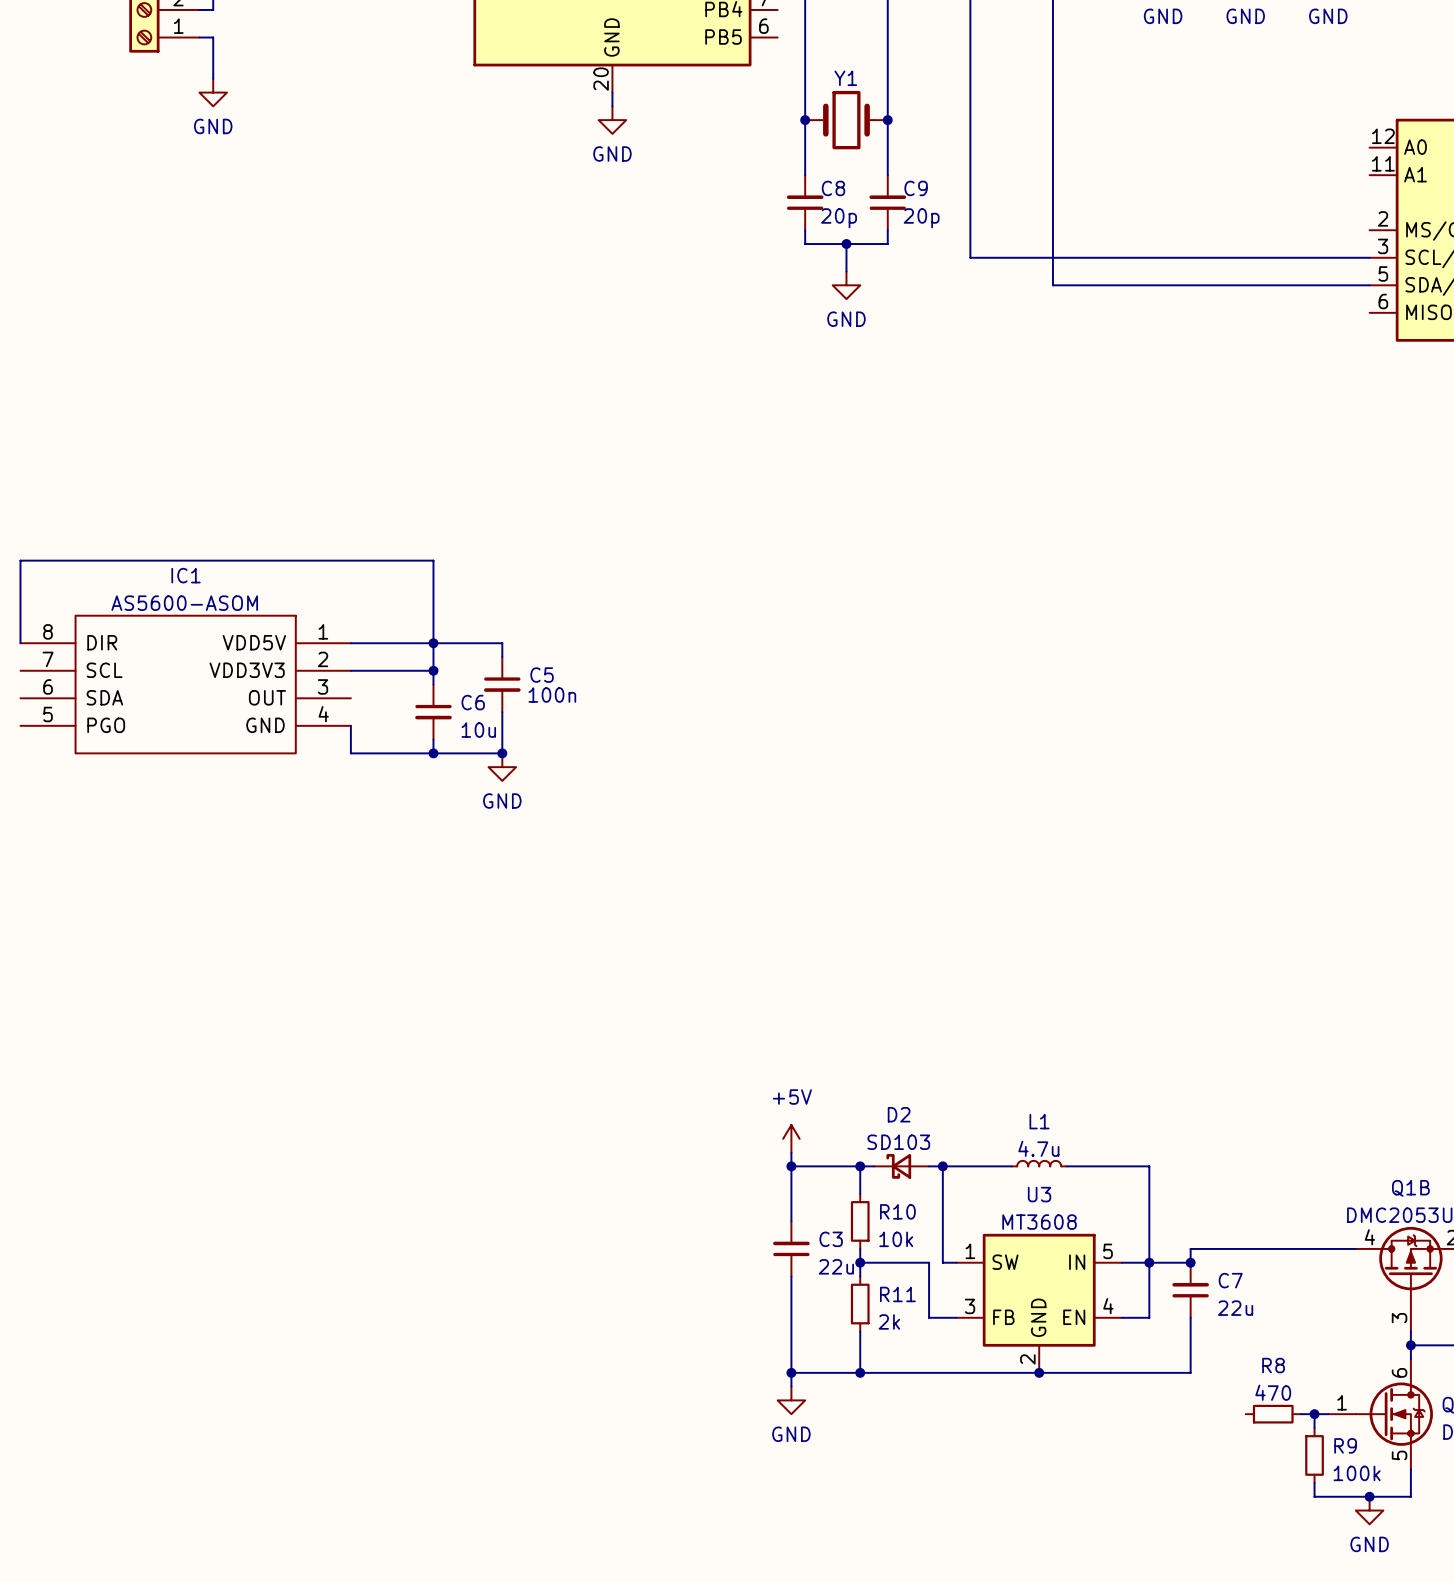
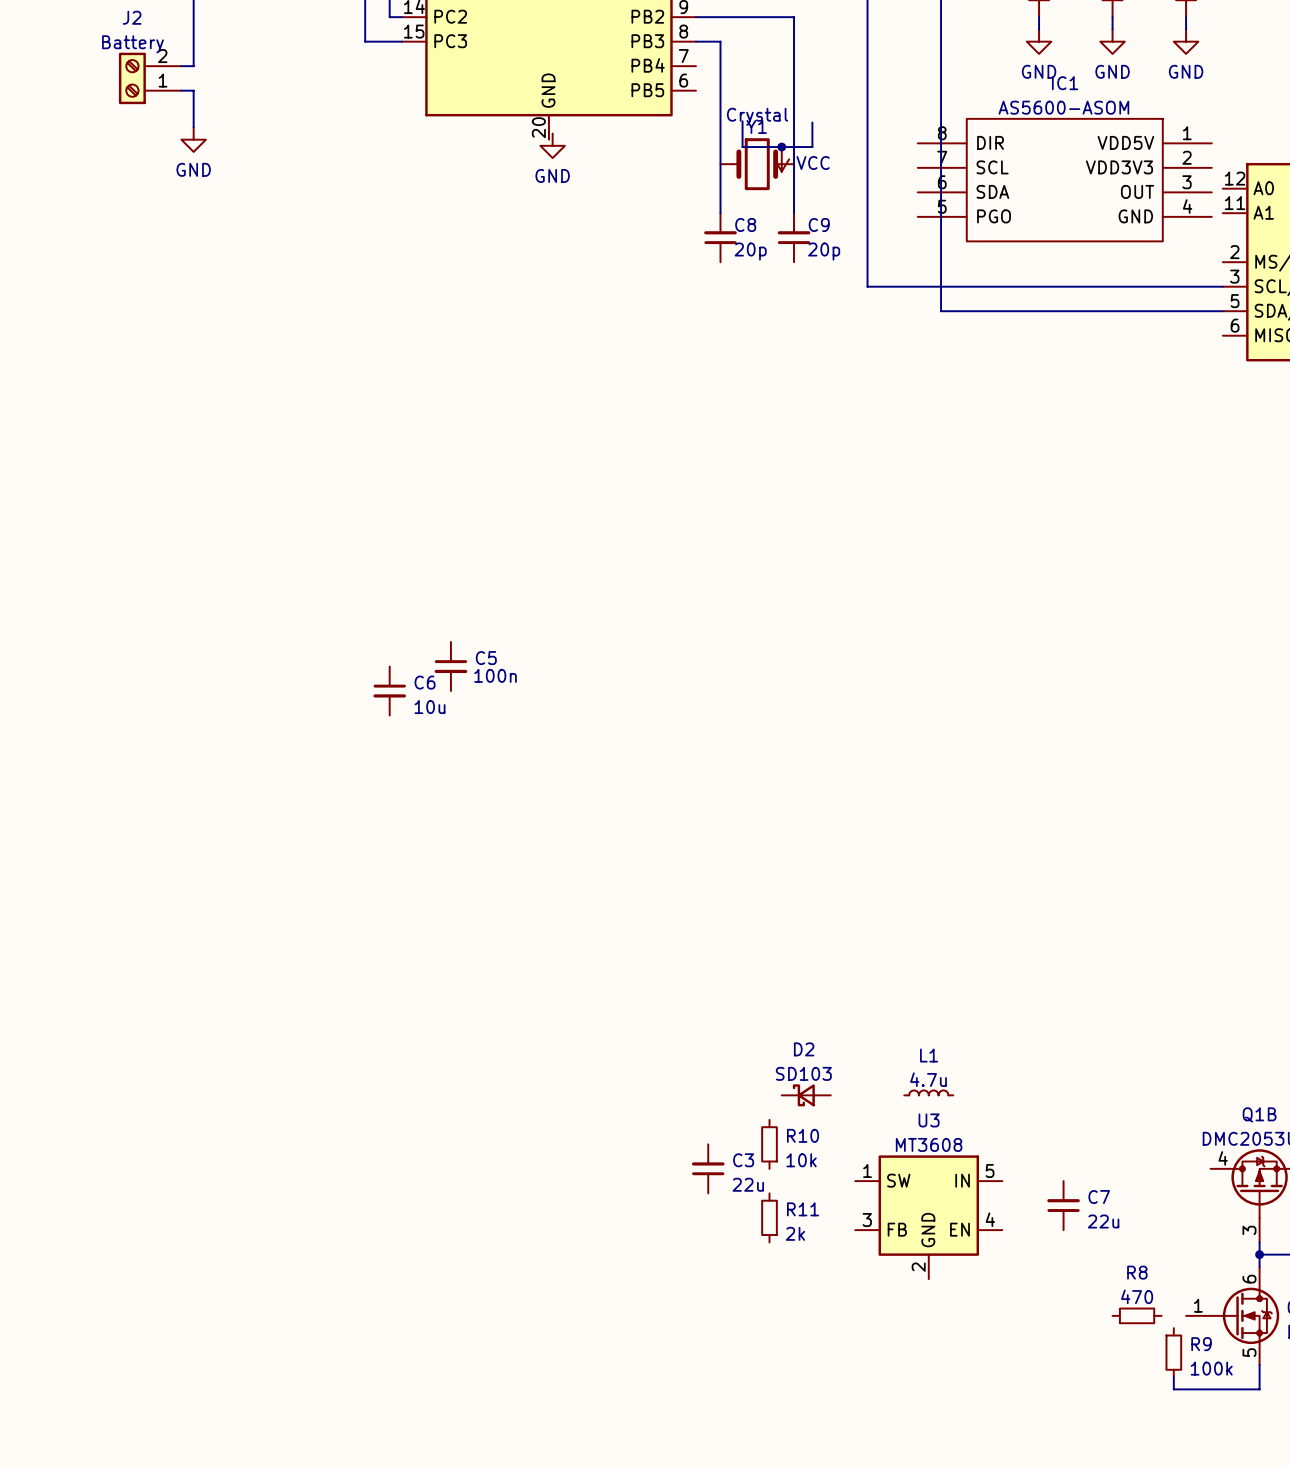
Y1 value: none -> Crystal (757, 116)
wire: none -> (742, 121) (742, 147) (812, 147) (812, 122)
wire: (612, 92) (612, 106) -> none
power symbol: none -> VCC (781, 159)
power symbol position: GND (612, 120) -> GND (552, 145)
junction: (805, 120) -> none
junction position: (887, 120) -> (781, 147)
wire: (805, 230) (805, 244) (887, 244) (887, 230) -> none
wire: (846, 244) (846, 271) -> none
junction: (846, 244) -> none
power symbol: GND (846, 285) -> none
wire: (20, 643) (20, 560) (433, 560) (433, 684) -> none
wire: (350, 643) (502, 643) (502, 657) -> none
junction: (433, 643) -> none
wire: (350, 670) (433, 670) -> none
junction: (433, 670) -> none
IC1 position: (185, 684) -> (1064, 180)
wire: (502, 712) (502, 753) (350, 753) (350, 725) -> none
wire: (433, 739) (433, 753) -> none
junction: (433, 753) -> none
junction: (502, 753) -> none
power symbol: GND (502, 767) -> none
power symbol: +5V (791, 1138) -> none
wire: (791, 1152) (791, 1221) -> none
wire: (791, 1166) (874, 1166) -> none
junction: (791, 1166) -> none
wire: (860, 1166) (860, 1193) -> none
junction: (860, 1166) -> none
wire: (929, 1166) (1011, 1166) -> none
wire: (942, 1166) (942, 1262) (956, 1262) -> none
junction: (942, 1166) -> none
wire: (1066, 1166) (1149, 1166) (1149, 1317) (1121, 1317) -> none
wire: (860, 1248) (860, 1276) -> none
wire: (1355, 1248) (1190, 1248) (1190, 1262) (1121, 1262) -> none
wire: (860, 1262) (929, 1262) (929, 1317) (956, 1317) -> none
junction: (860, 1262) -> none
junction: (1149, 1262) -> none
junction: (1190, 1262) -> none
wire: (791, 1276) (791, 1386) -> none
wire: (1190, 1317) (1190, 1372) (791, 1372) -> none
wire: (860, 1331) (860, 1372) -> none
junction: (791, 1372) -> none
junction: (860, 1372) -> none
junction: (1039, 1372) -> none
power symbol: GND (791, 1400) -> none
wire: (1300, 1414) (1328, 1414) -> none
wire: (1314, 1414) (1314, 1427) -> none
junction: (1314, 1414) -> none
junction: (1369, 1496) -> none
power symbol: GND (1369, 1510) -> none

